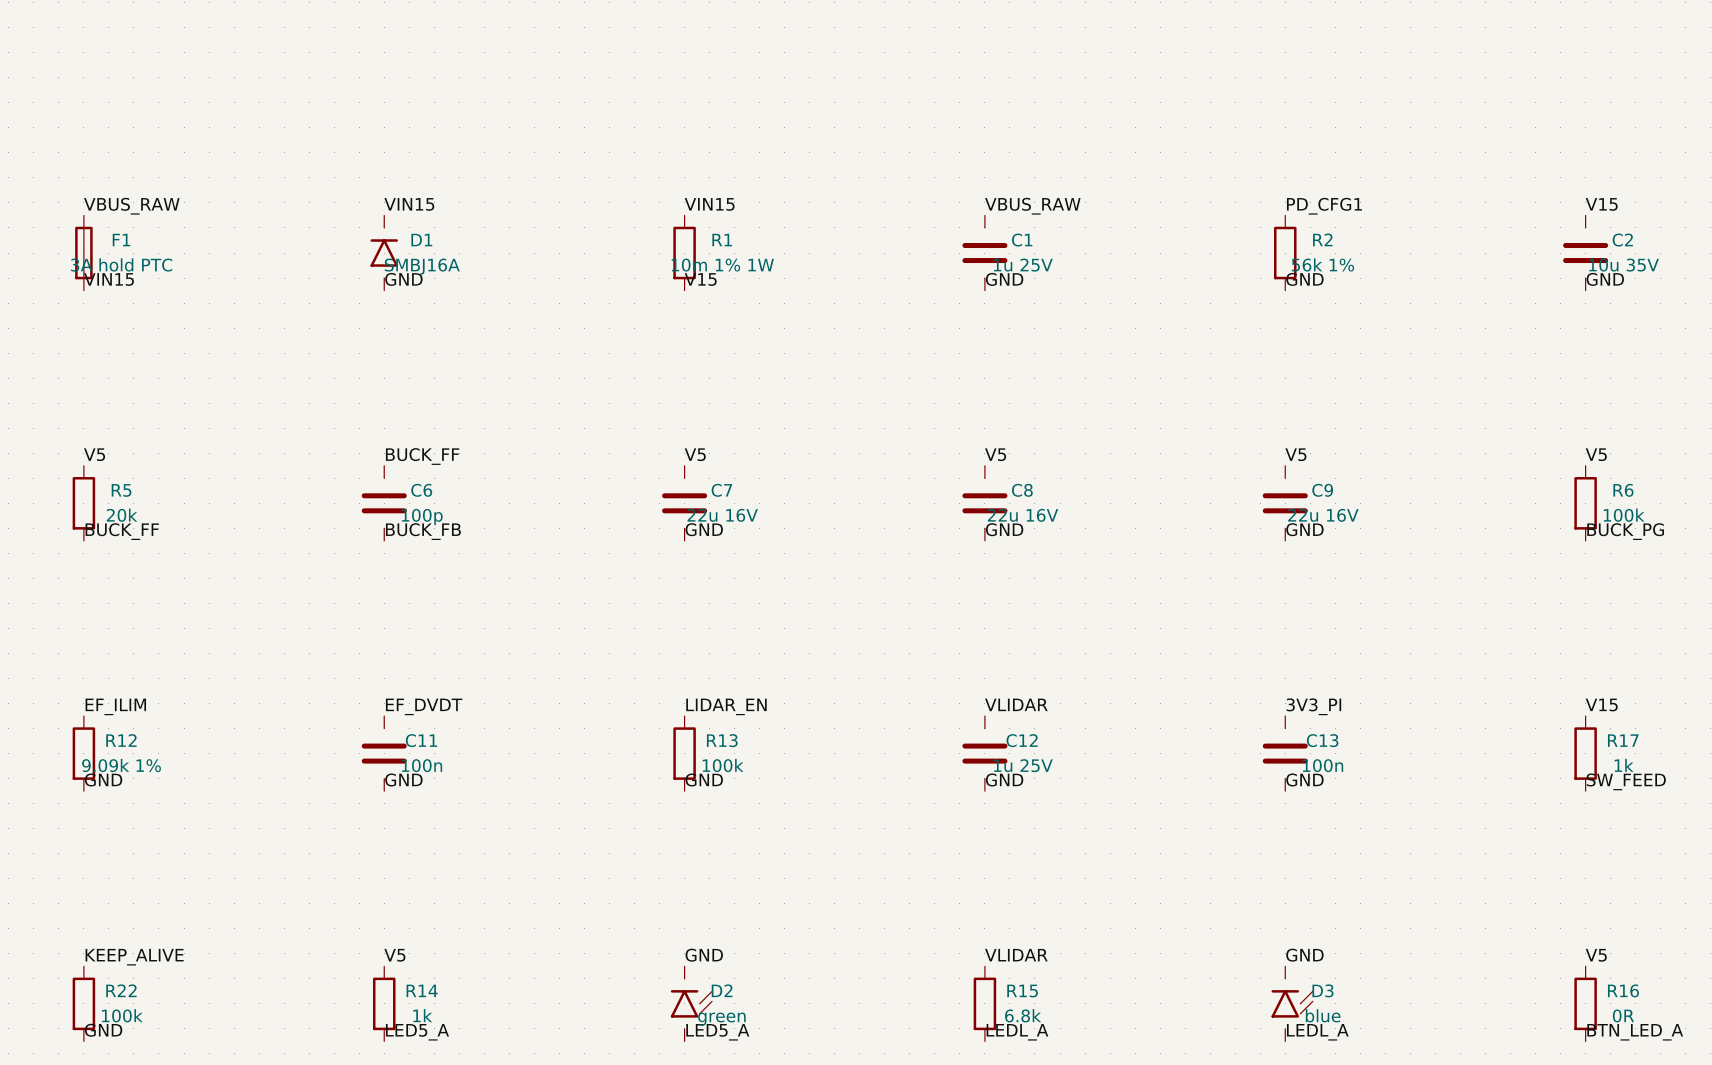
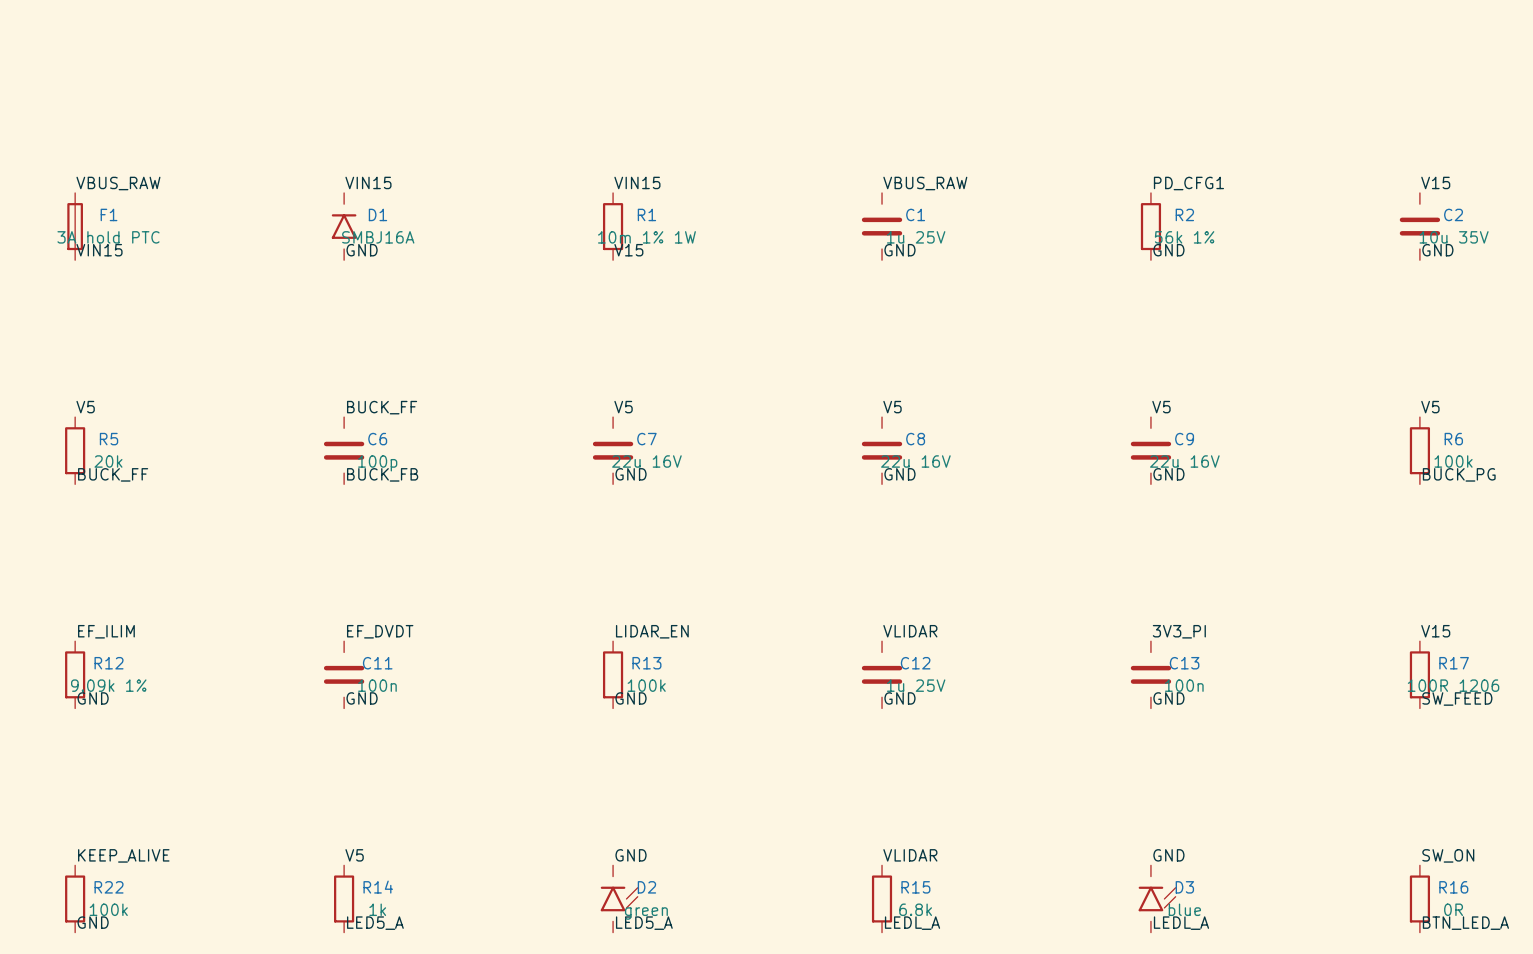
R17 value: 1k (1624, 765) -> 100R 1206 (1453, 685)
label: V5 (1596, 955) -> SW_ON (1448, 855)

